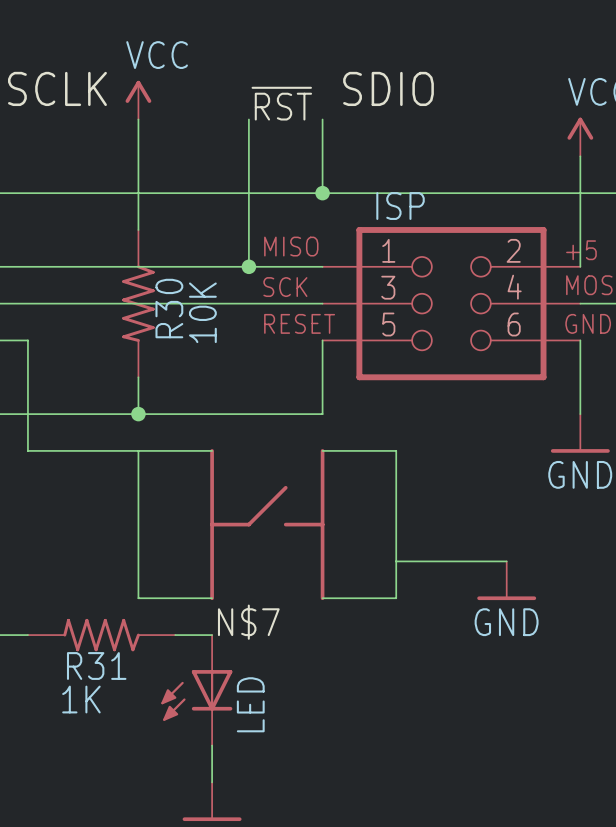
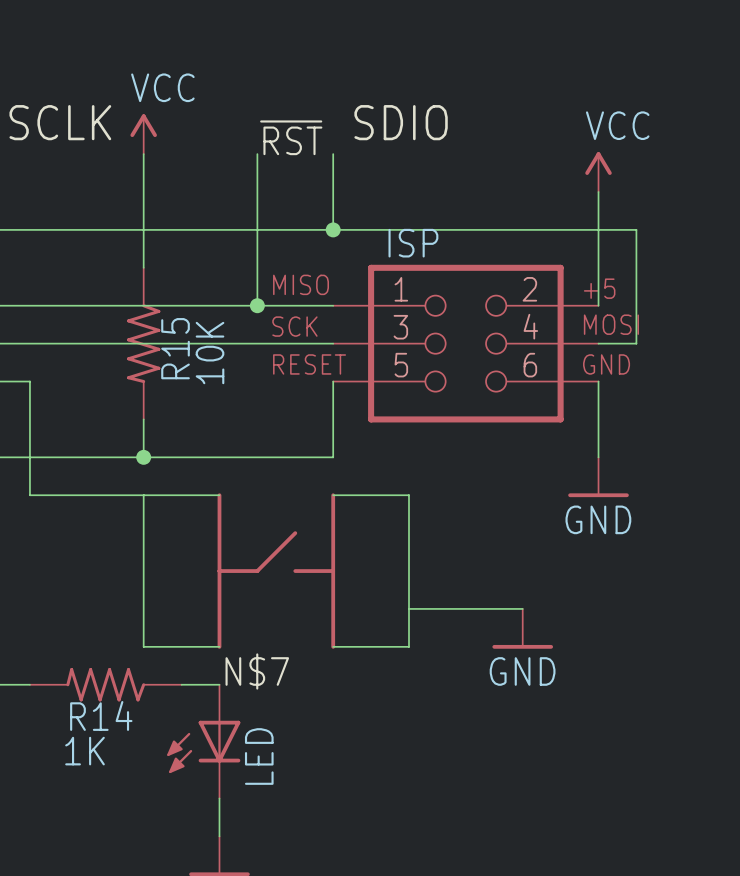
R30 name: R30 (169, 308) -> R15 (175, 348)
R31 name: R31 (96, 666) -> R14 (101, 715)

